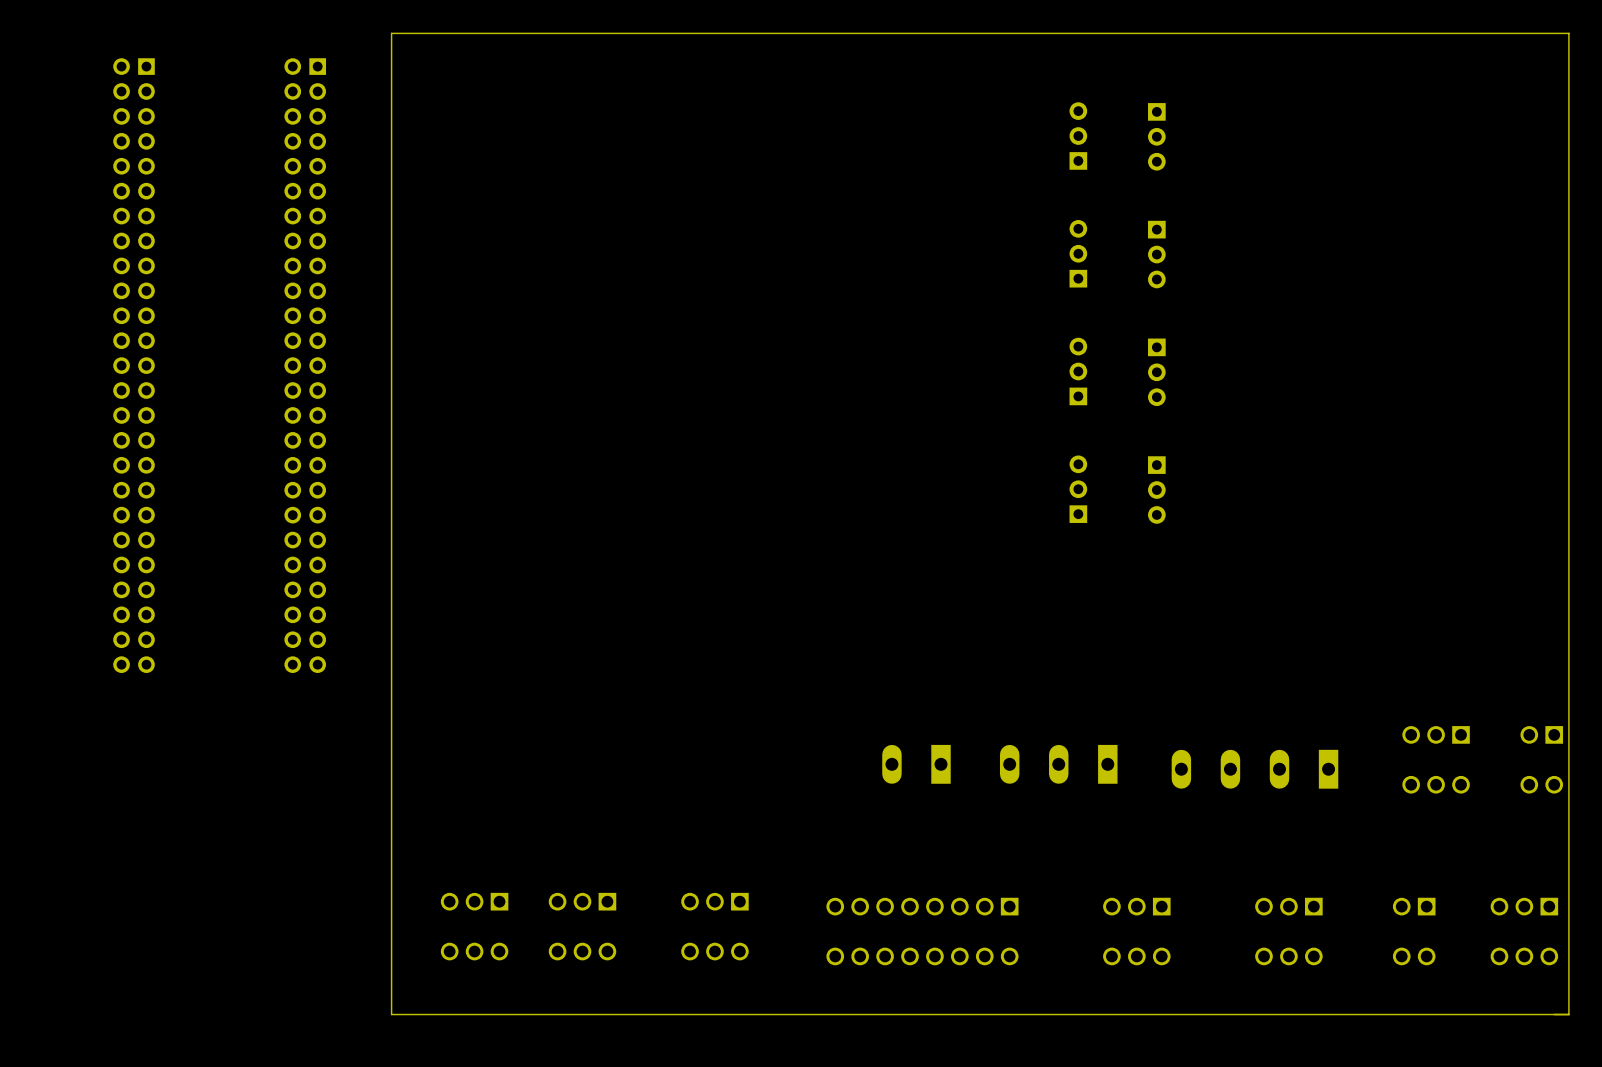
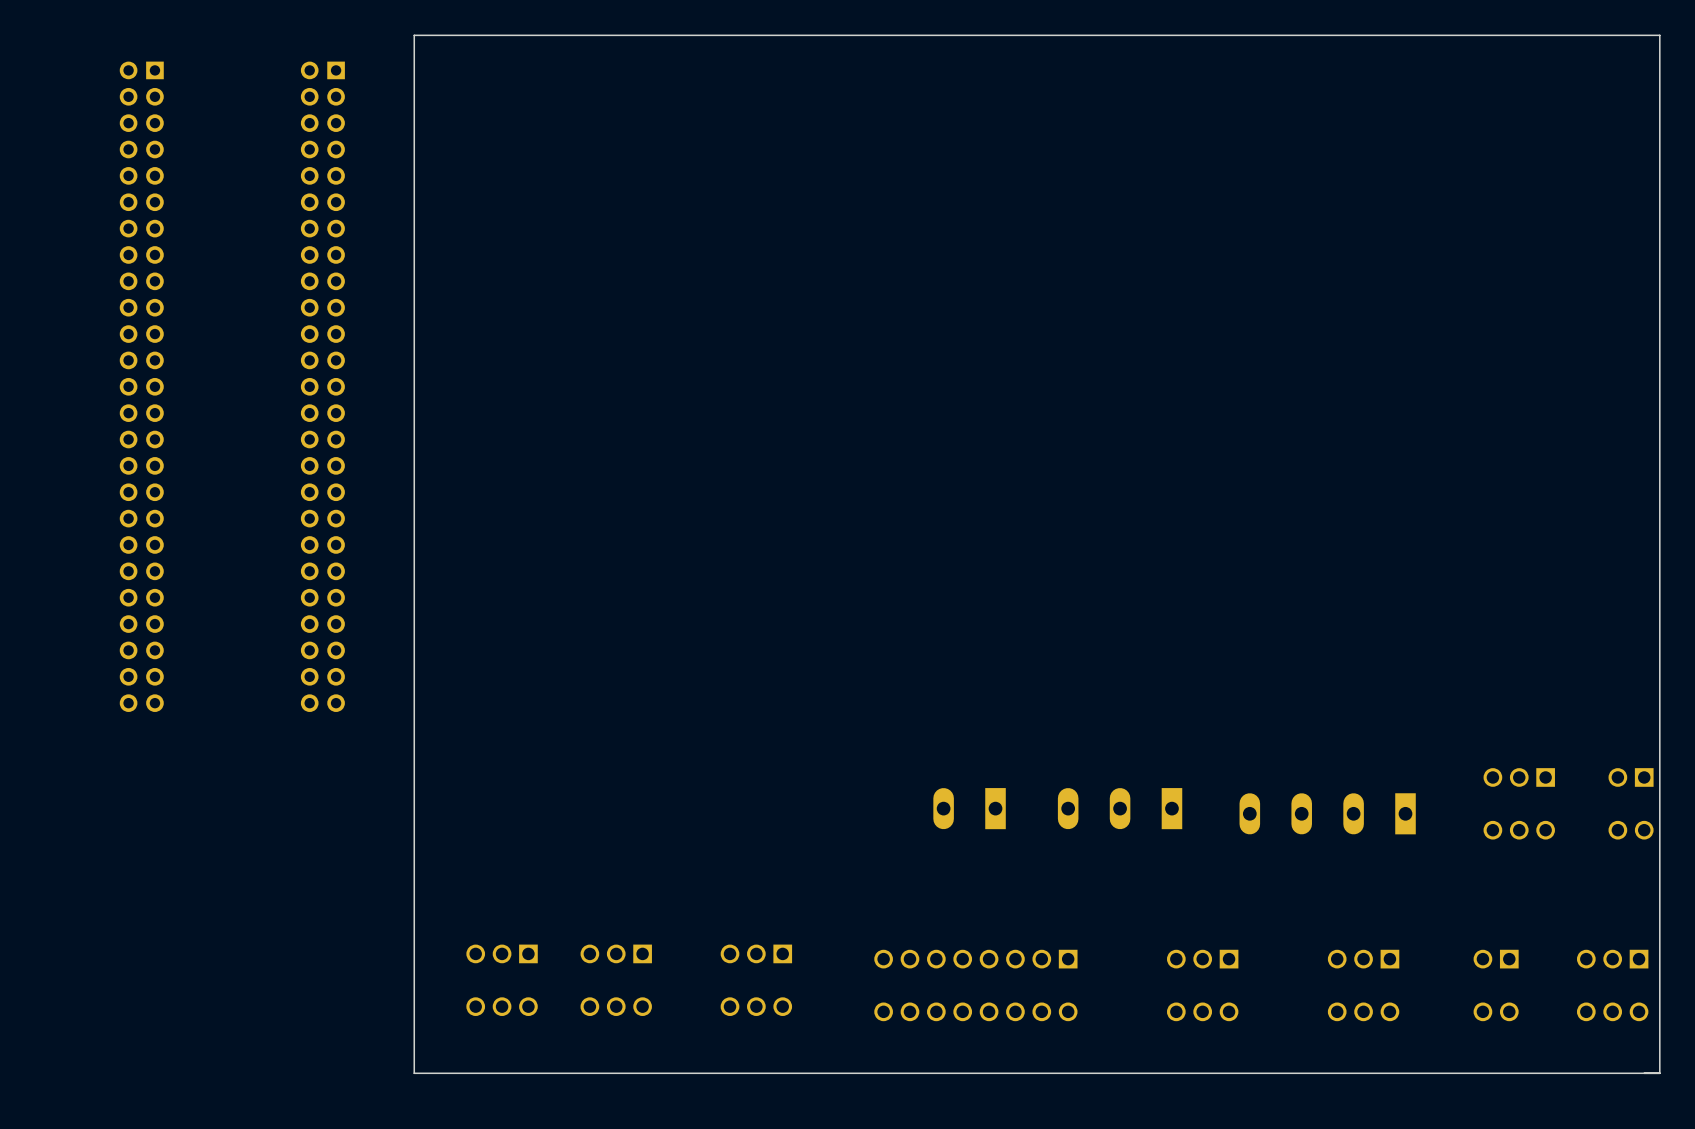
part: (1078, 136) -> none
part: (1156, 136) -> none
part: (1078, 253) -> none
part: (1156, 254) -> none
part: (1078, 371) -> none
part: (1156, 372) -> none
part: (1078, 489) -> none
part: (1156, 490) -> none

